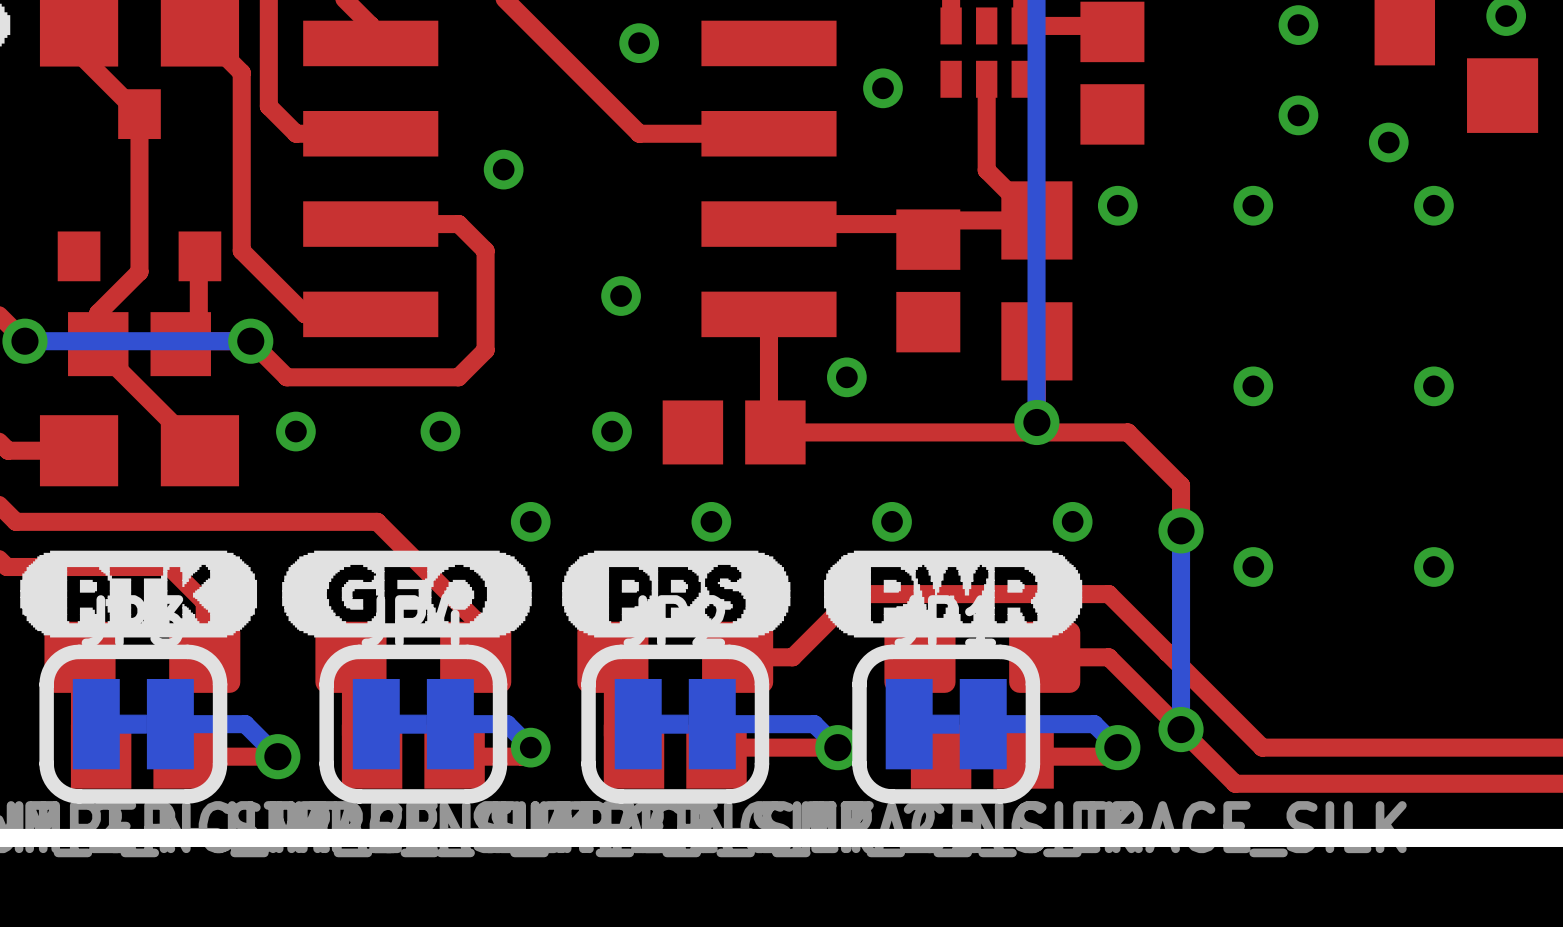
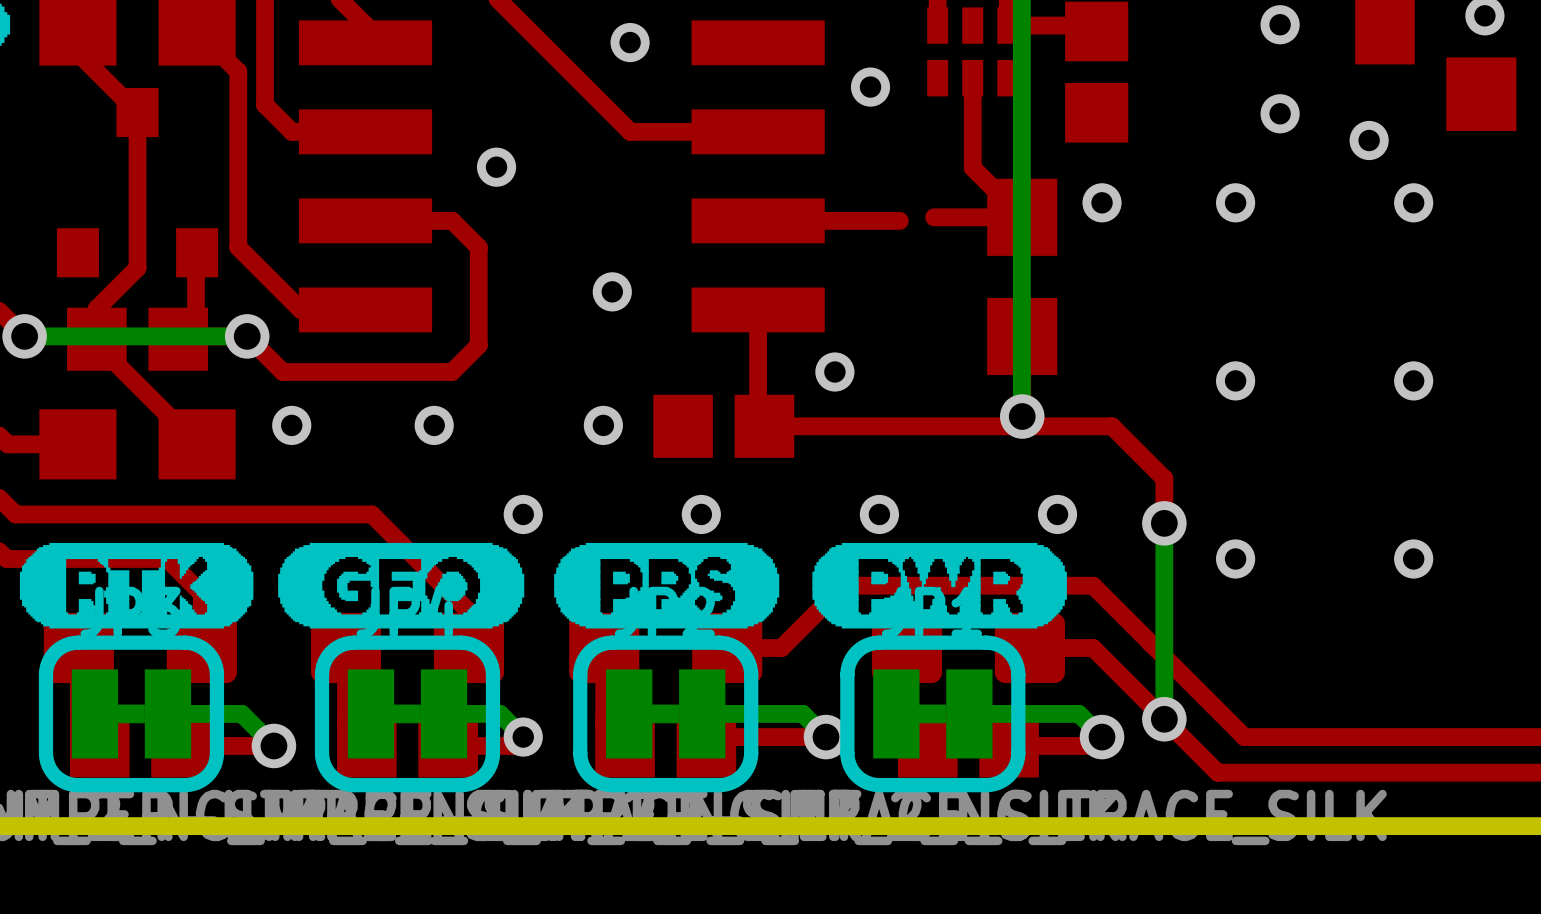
part: (928, 280) -> none

